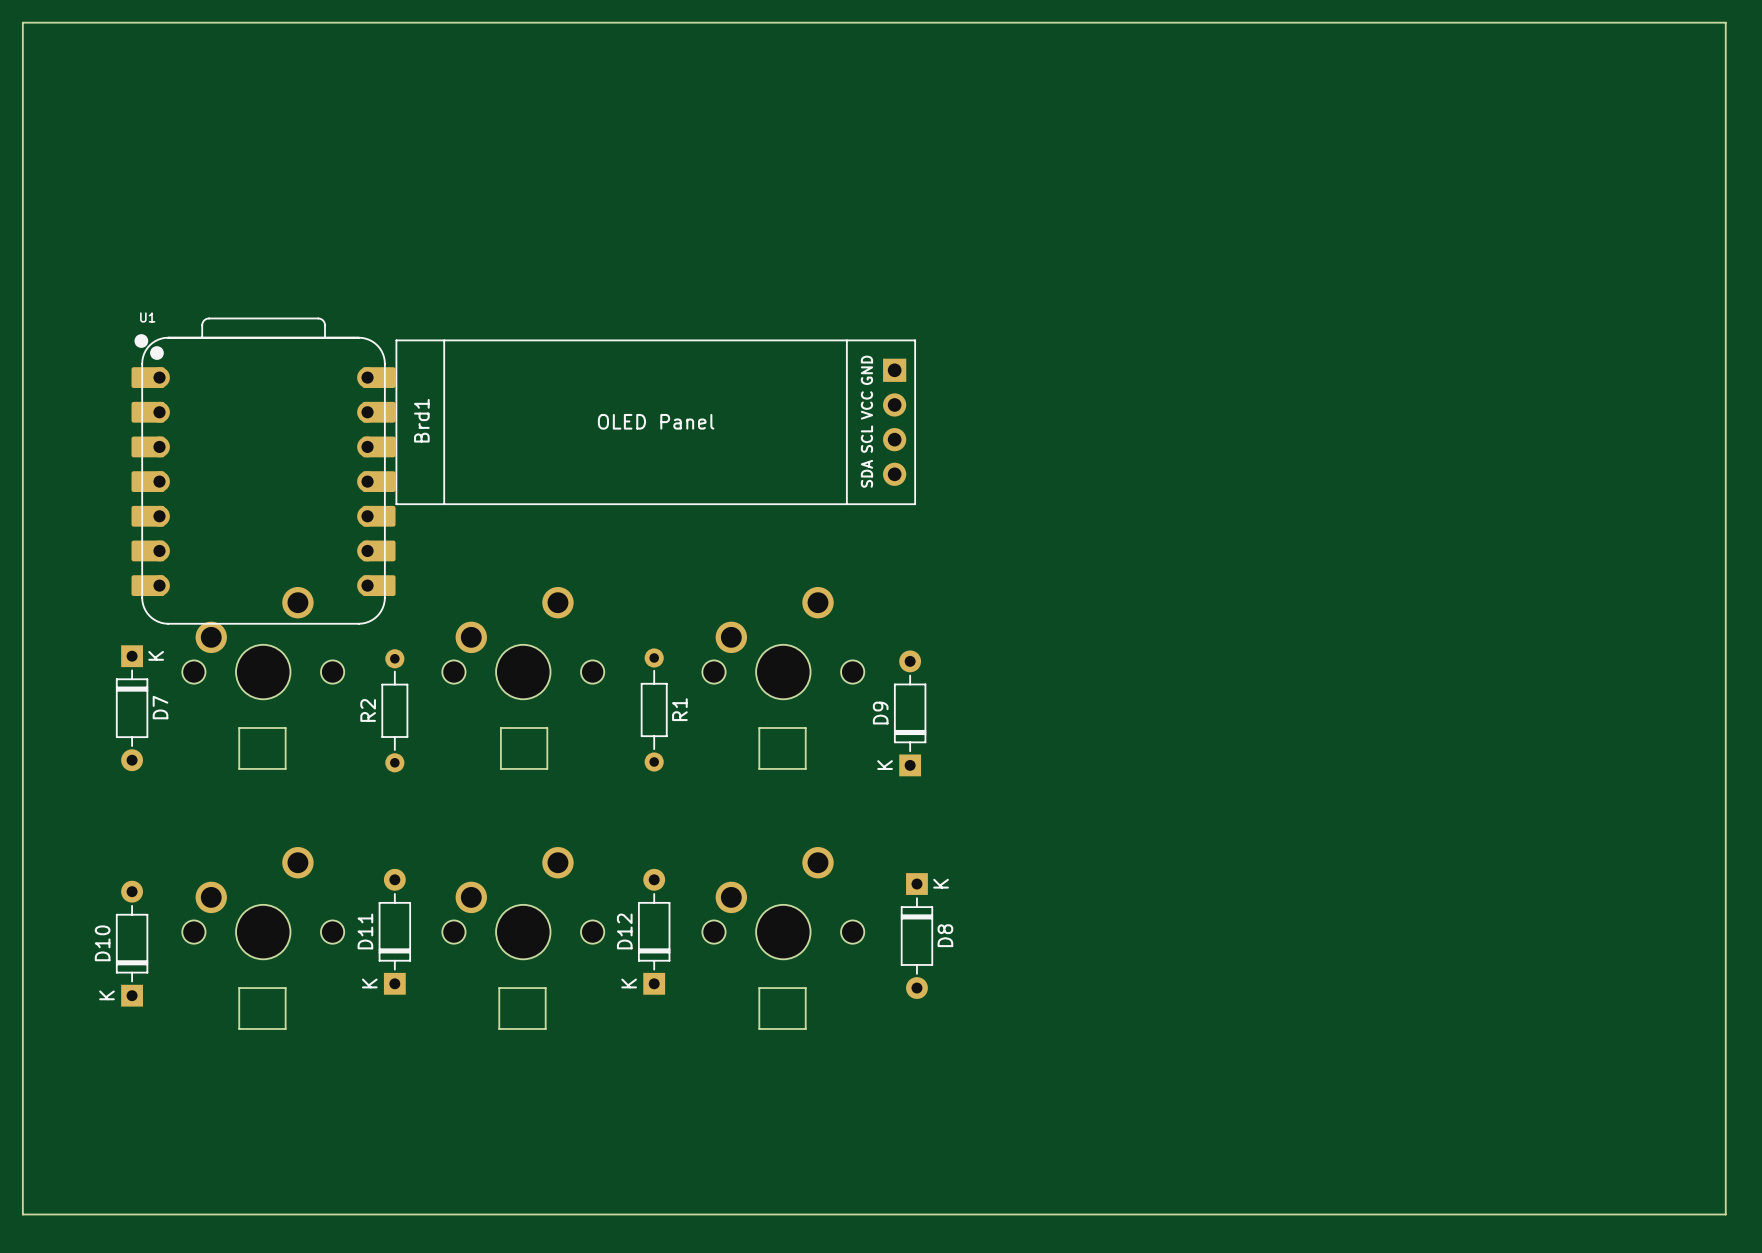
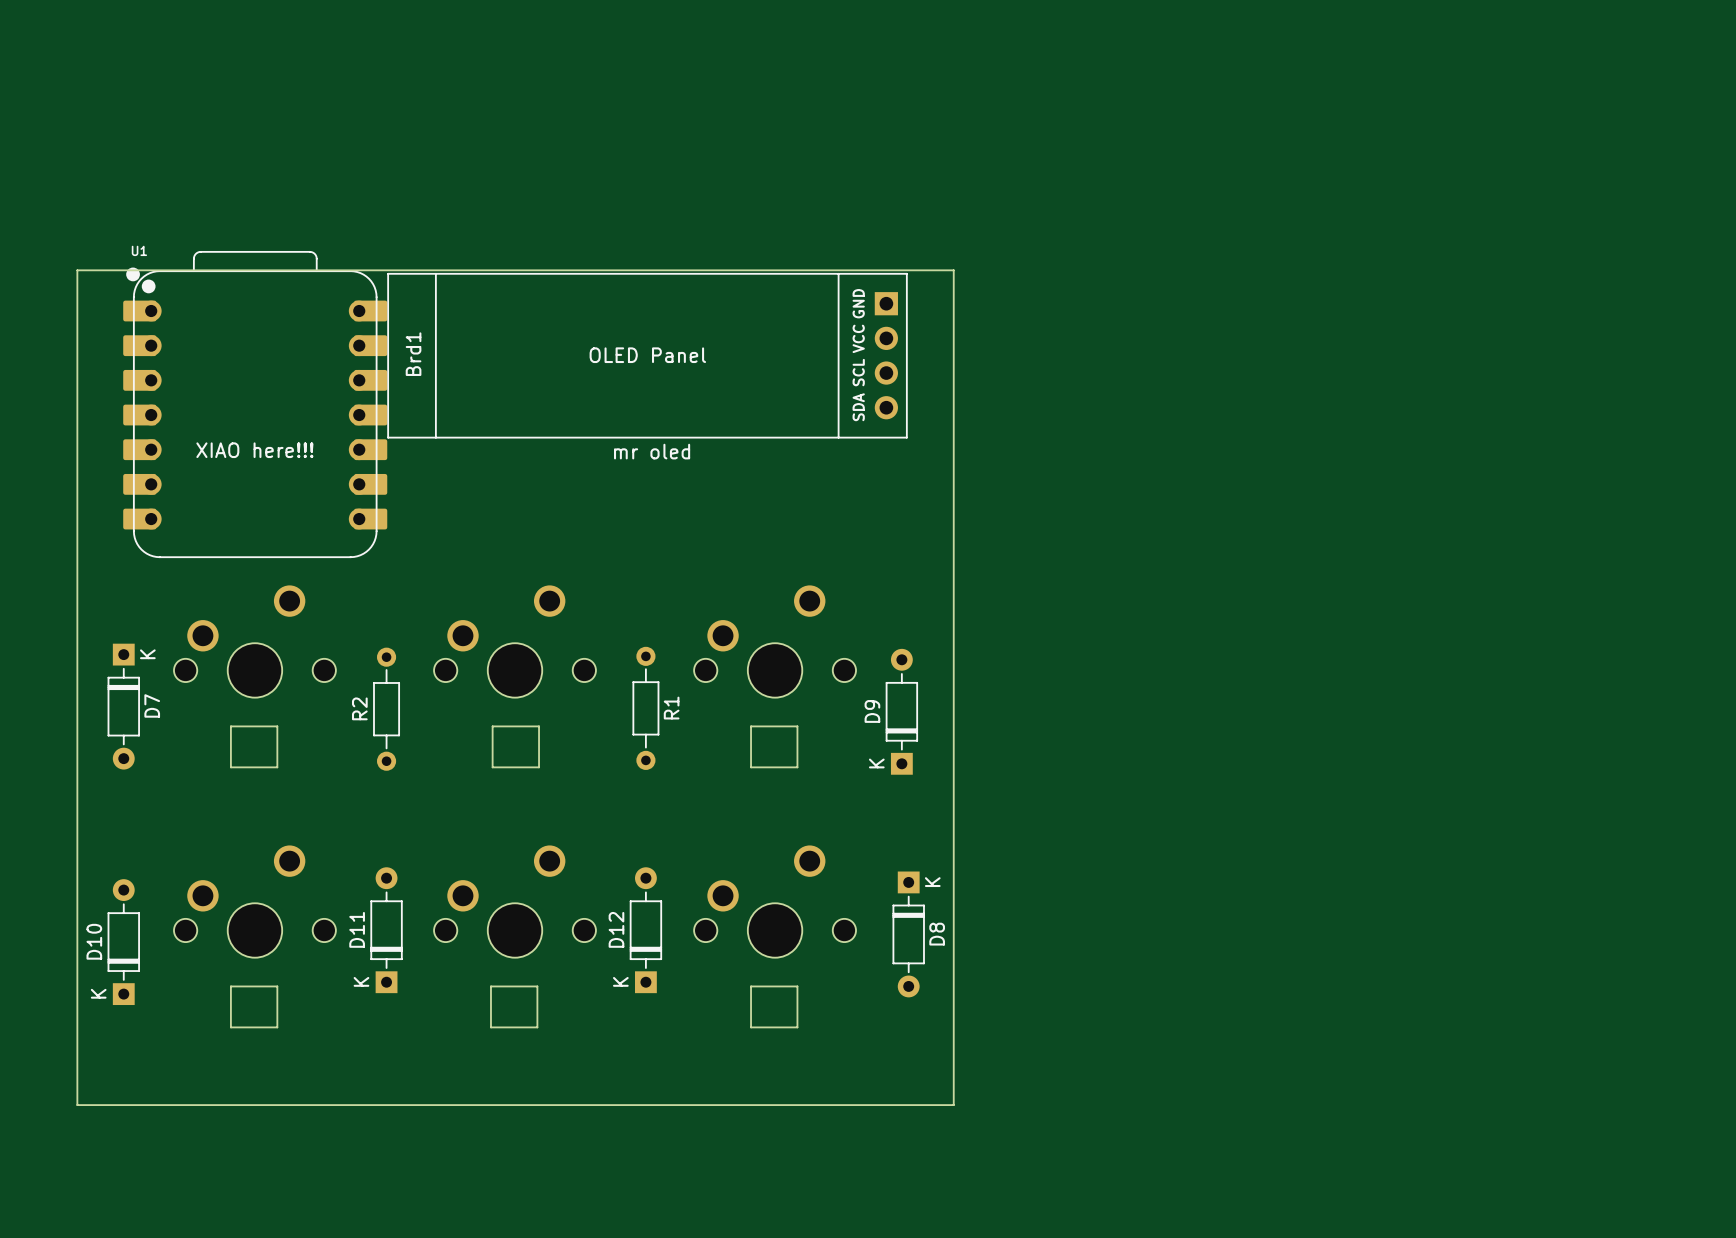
board edge: (22, 22) (1725, 22) (1725, 1214) (22, 1214) (22, 22) -> none
board edge: none -> (77, 270) (953, 270) (953, 1105) (77, 1105) (77, 270)
Brd1 position: (655, 422) -> (647, 355)
text: none -> XIAO here!!! (254, 450)
text: none -> mr oled (652, 451)
U1 position: (263, 471) -> (255, 404)

